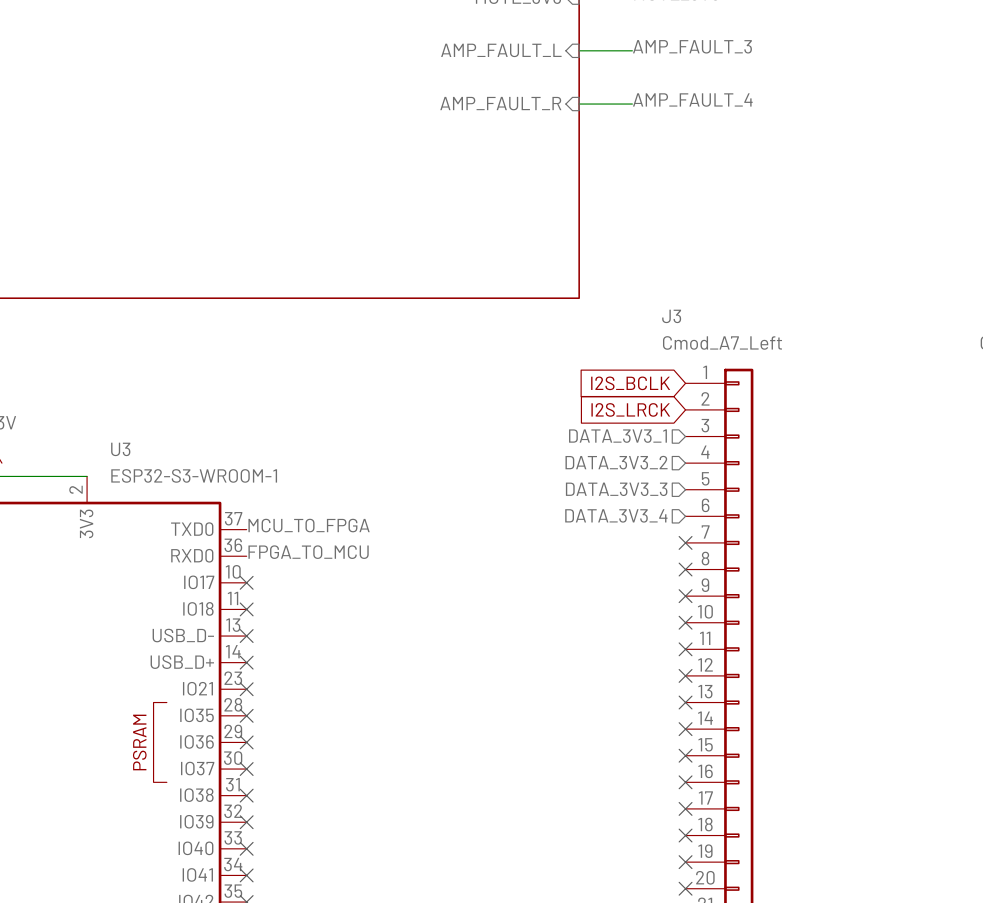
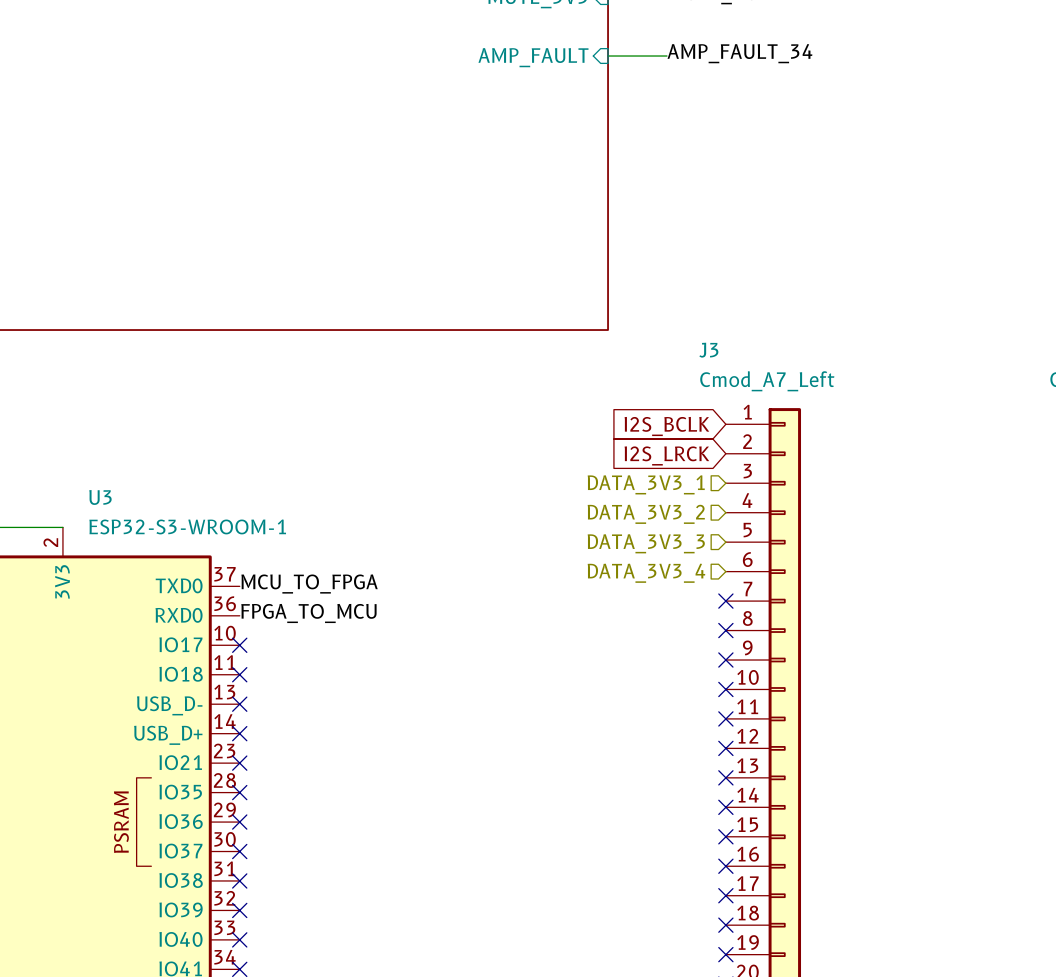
label: AMP_FAULT_3 (692, 46) -> AMP_FAULT_34 (739, 53)
sheet pin: AMP_FAULT_L (501, 50) -> AMP_FAULT (533, 57)
label: AMP_FAULT_4 (692, 100) -> none
sheet pin: AMP_FAULT_R (500, 103) -> none
wire: (579, 104) (632, 104) -> none

